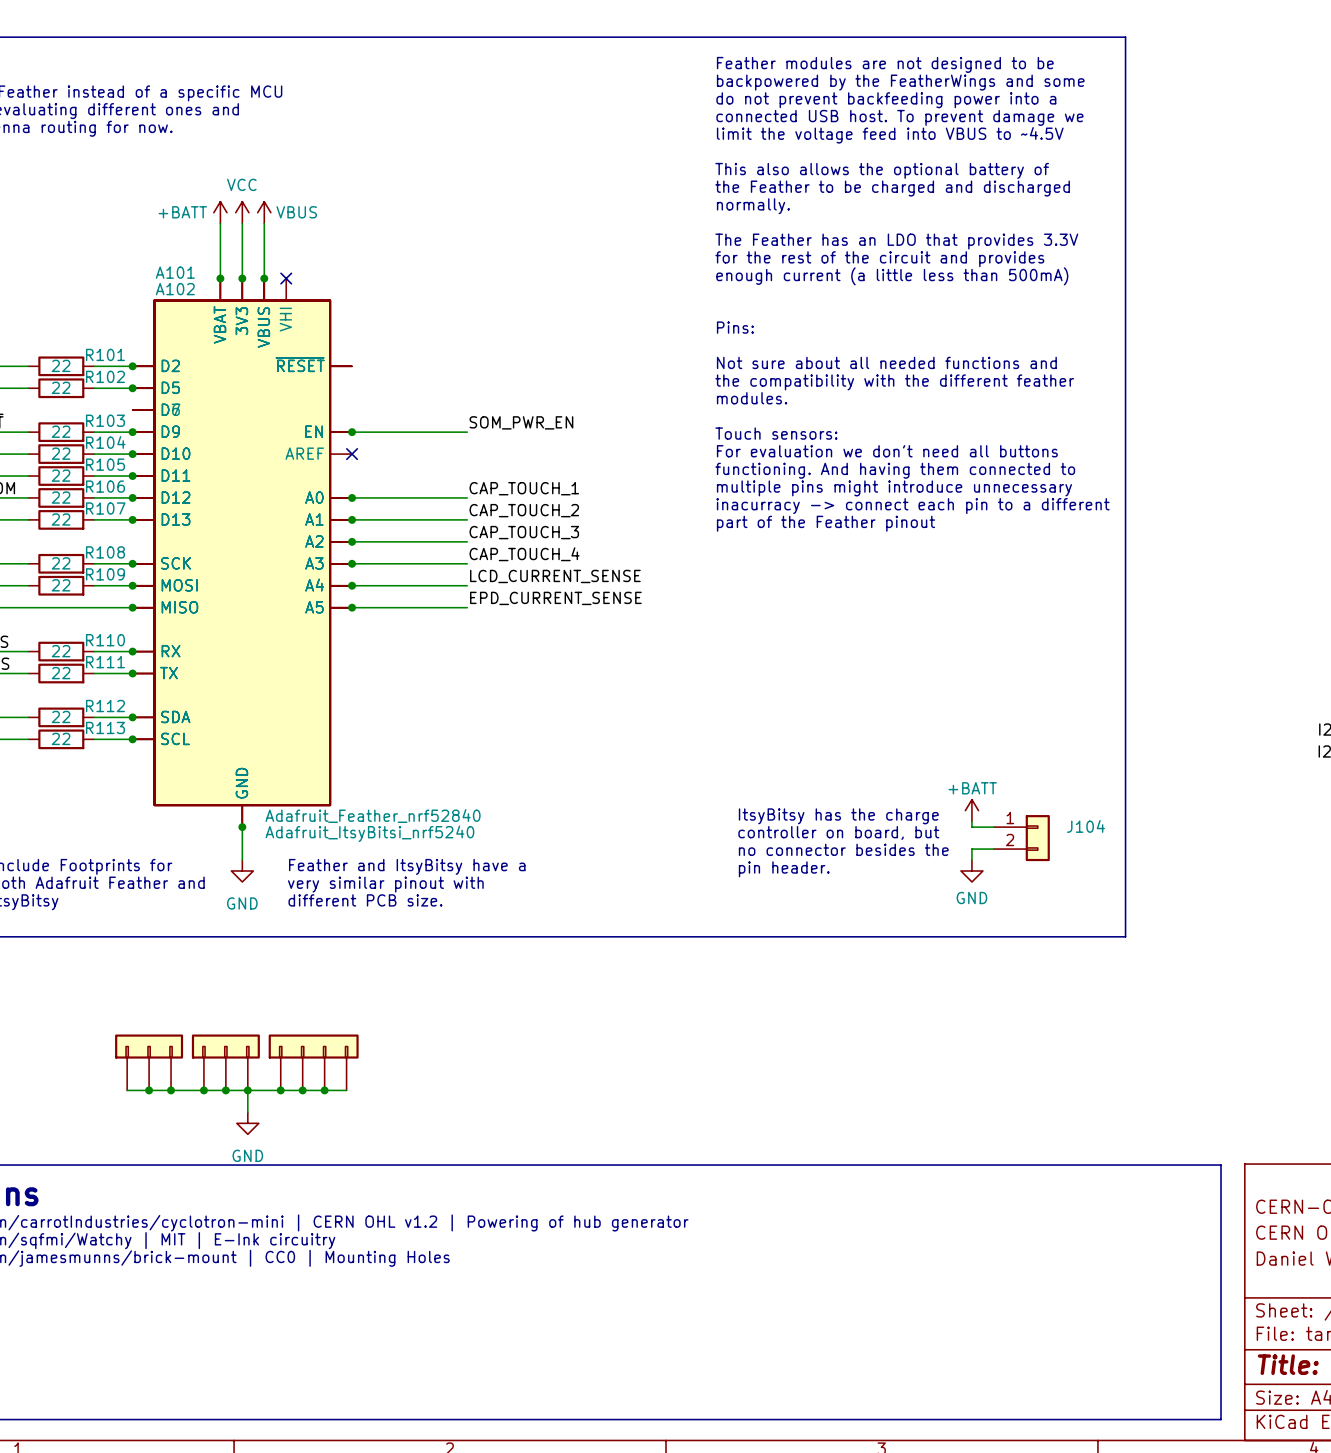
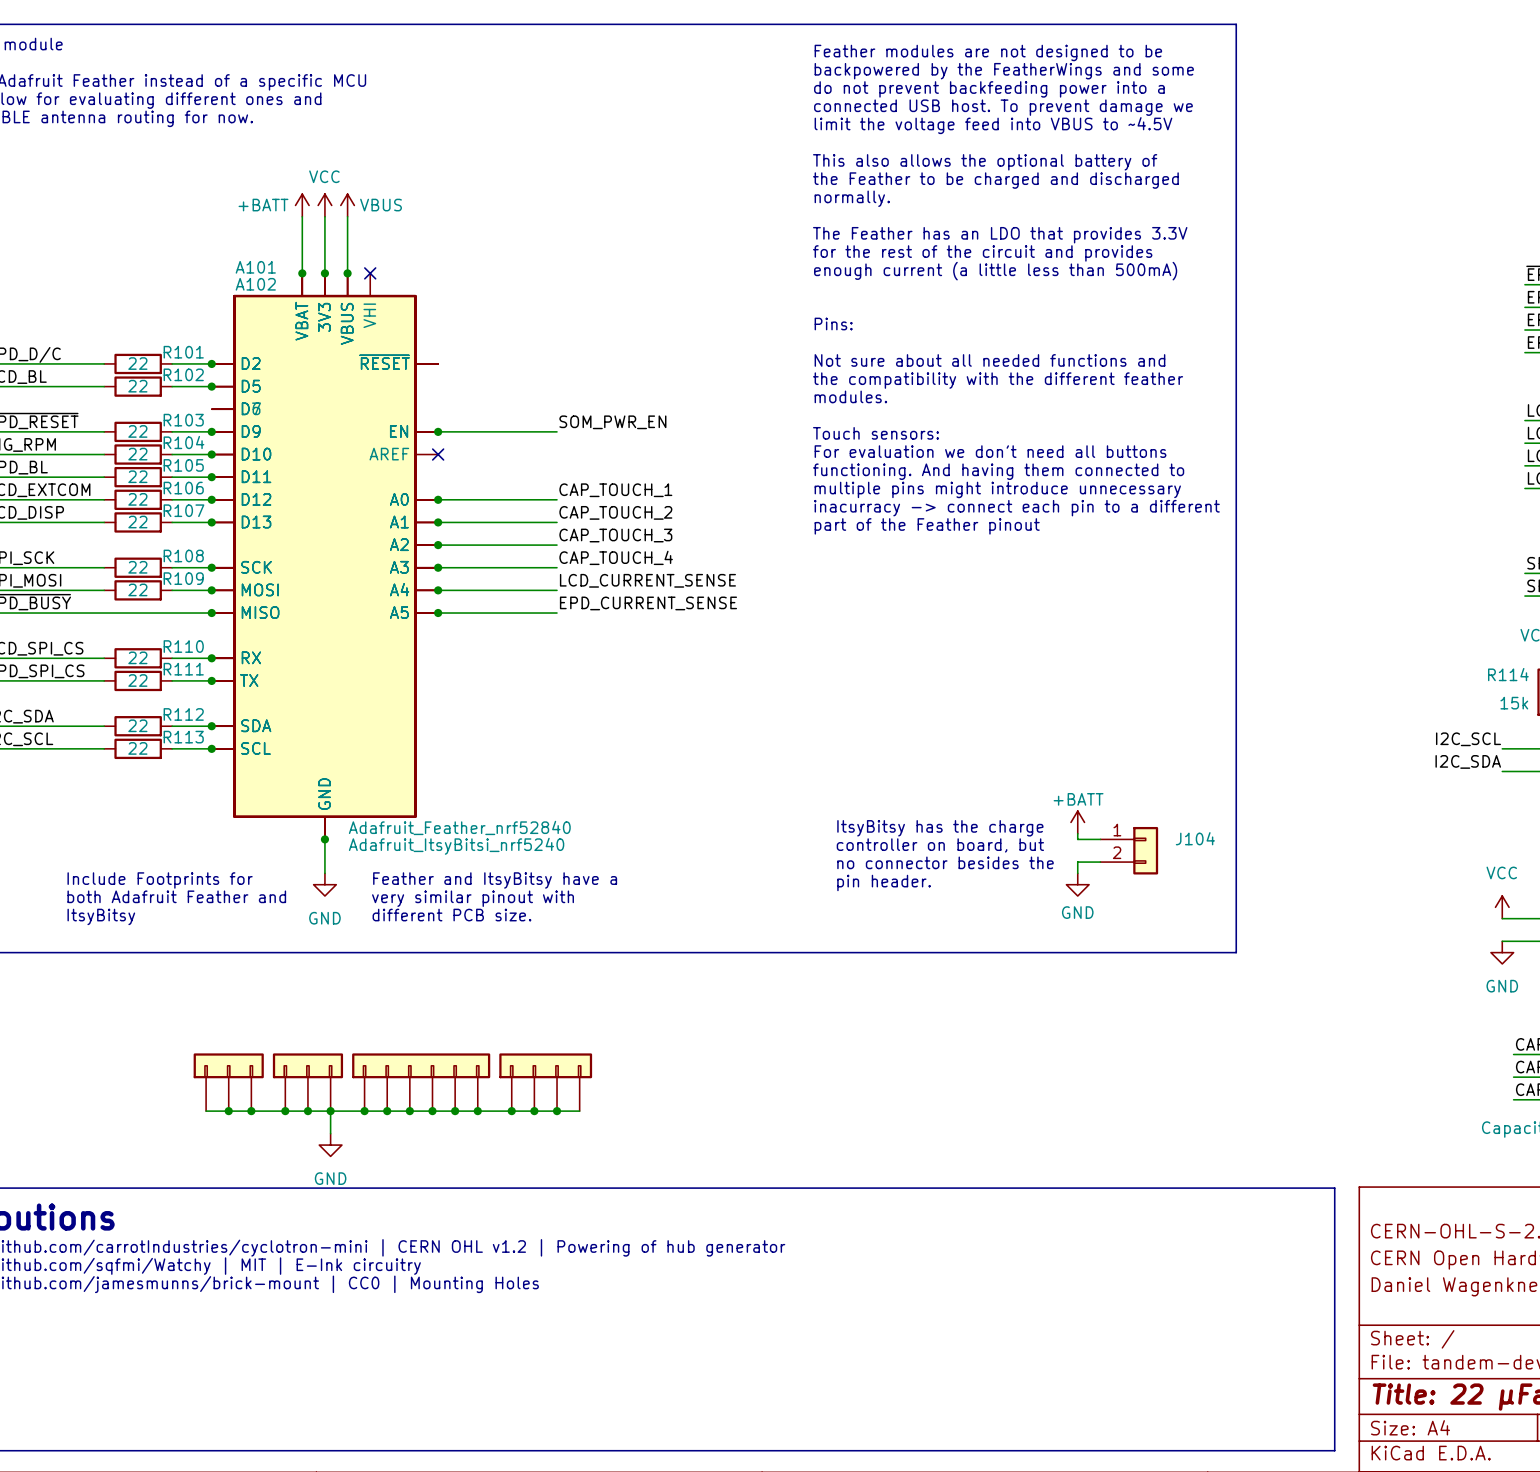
part position: (313, 1062) -> (545, 1082)
part: none -> (421, 1082)
wire: none -> (432, 1111) (579, 1111)
junction: none -> (432, 1111)
junction: none -> (455, 1111)
junction: none -> (477, 1111)
junction: none -> (511, 1111)
junction: none -> (534, 1111)
junction: none -> (557, 1111)

